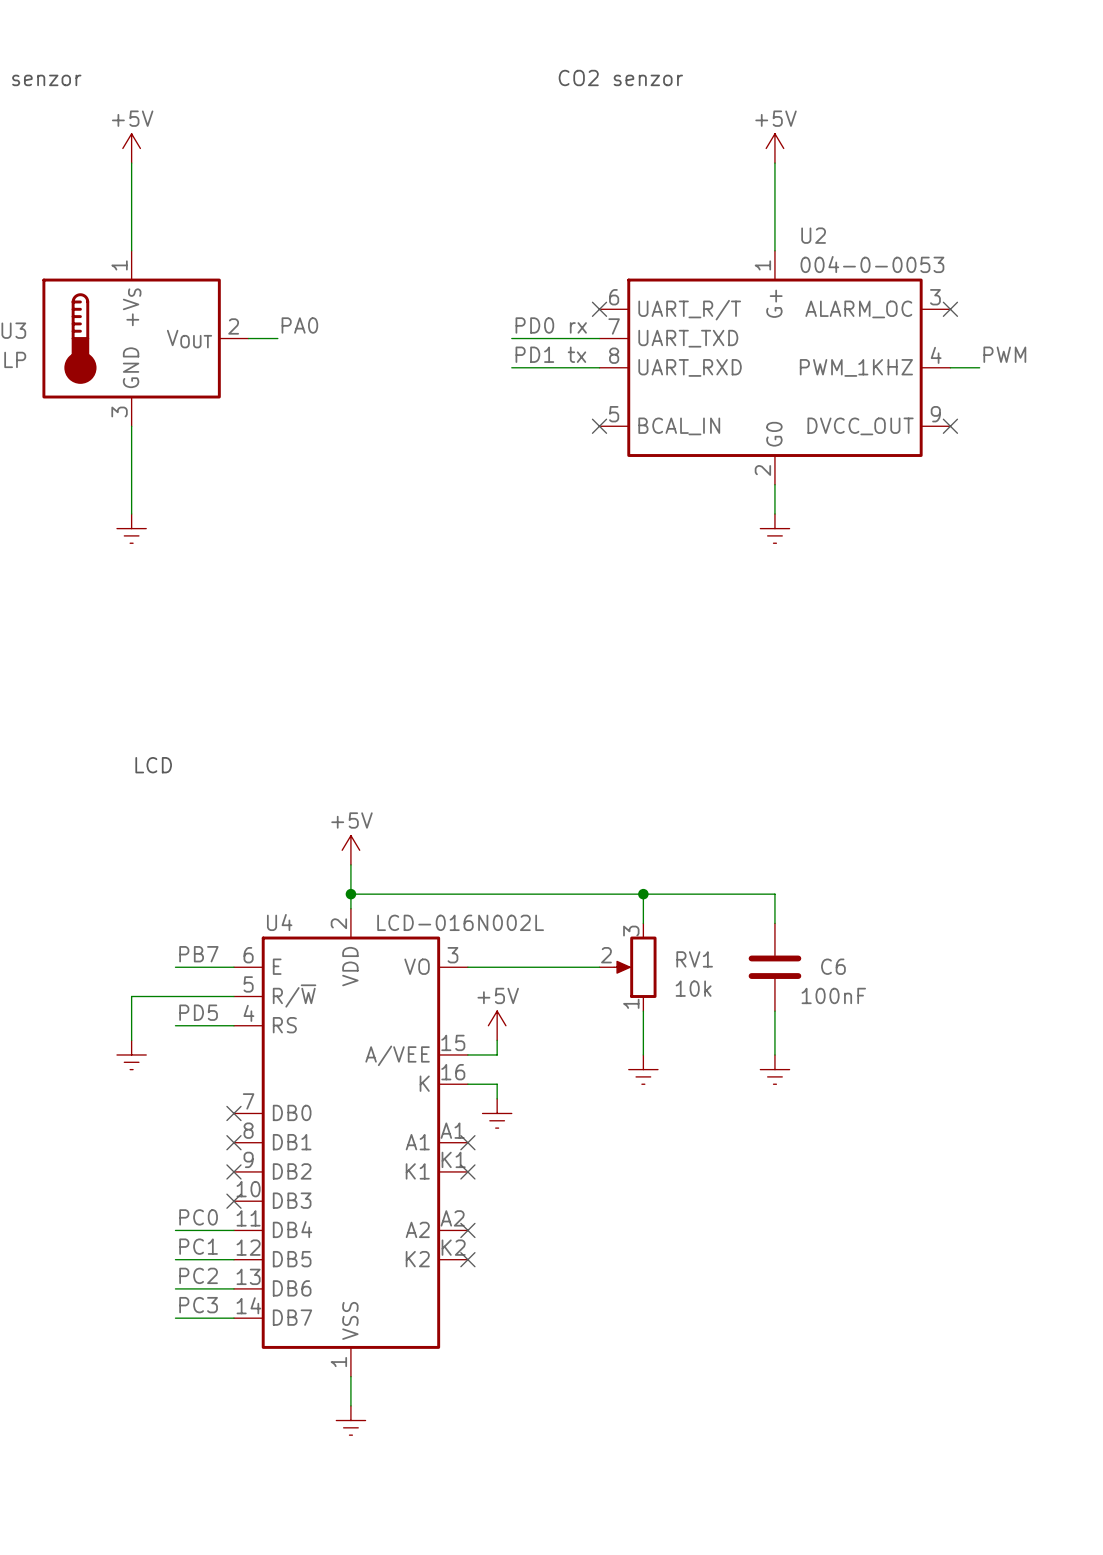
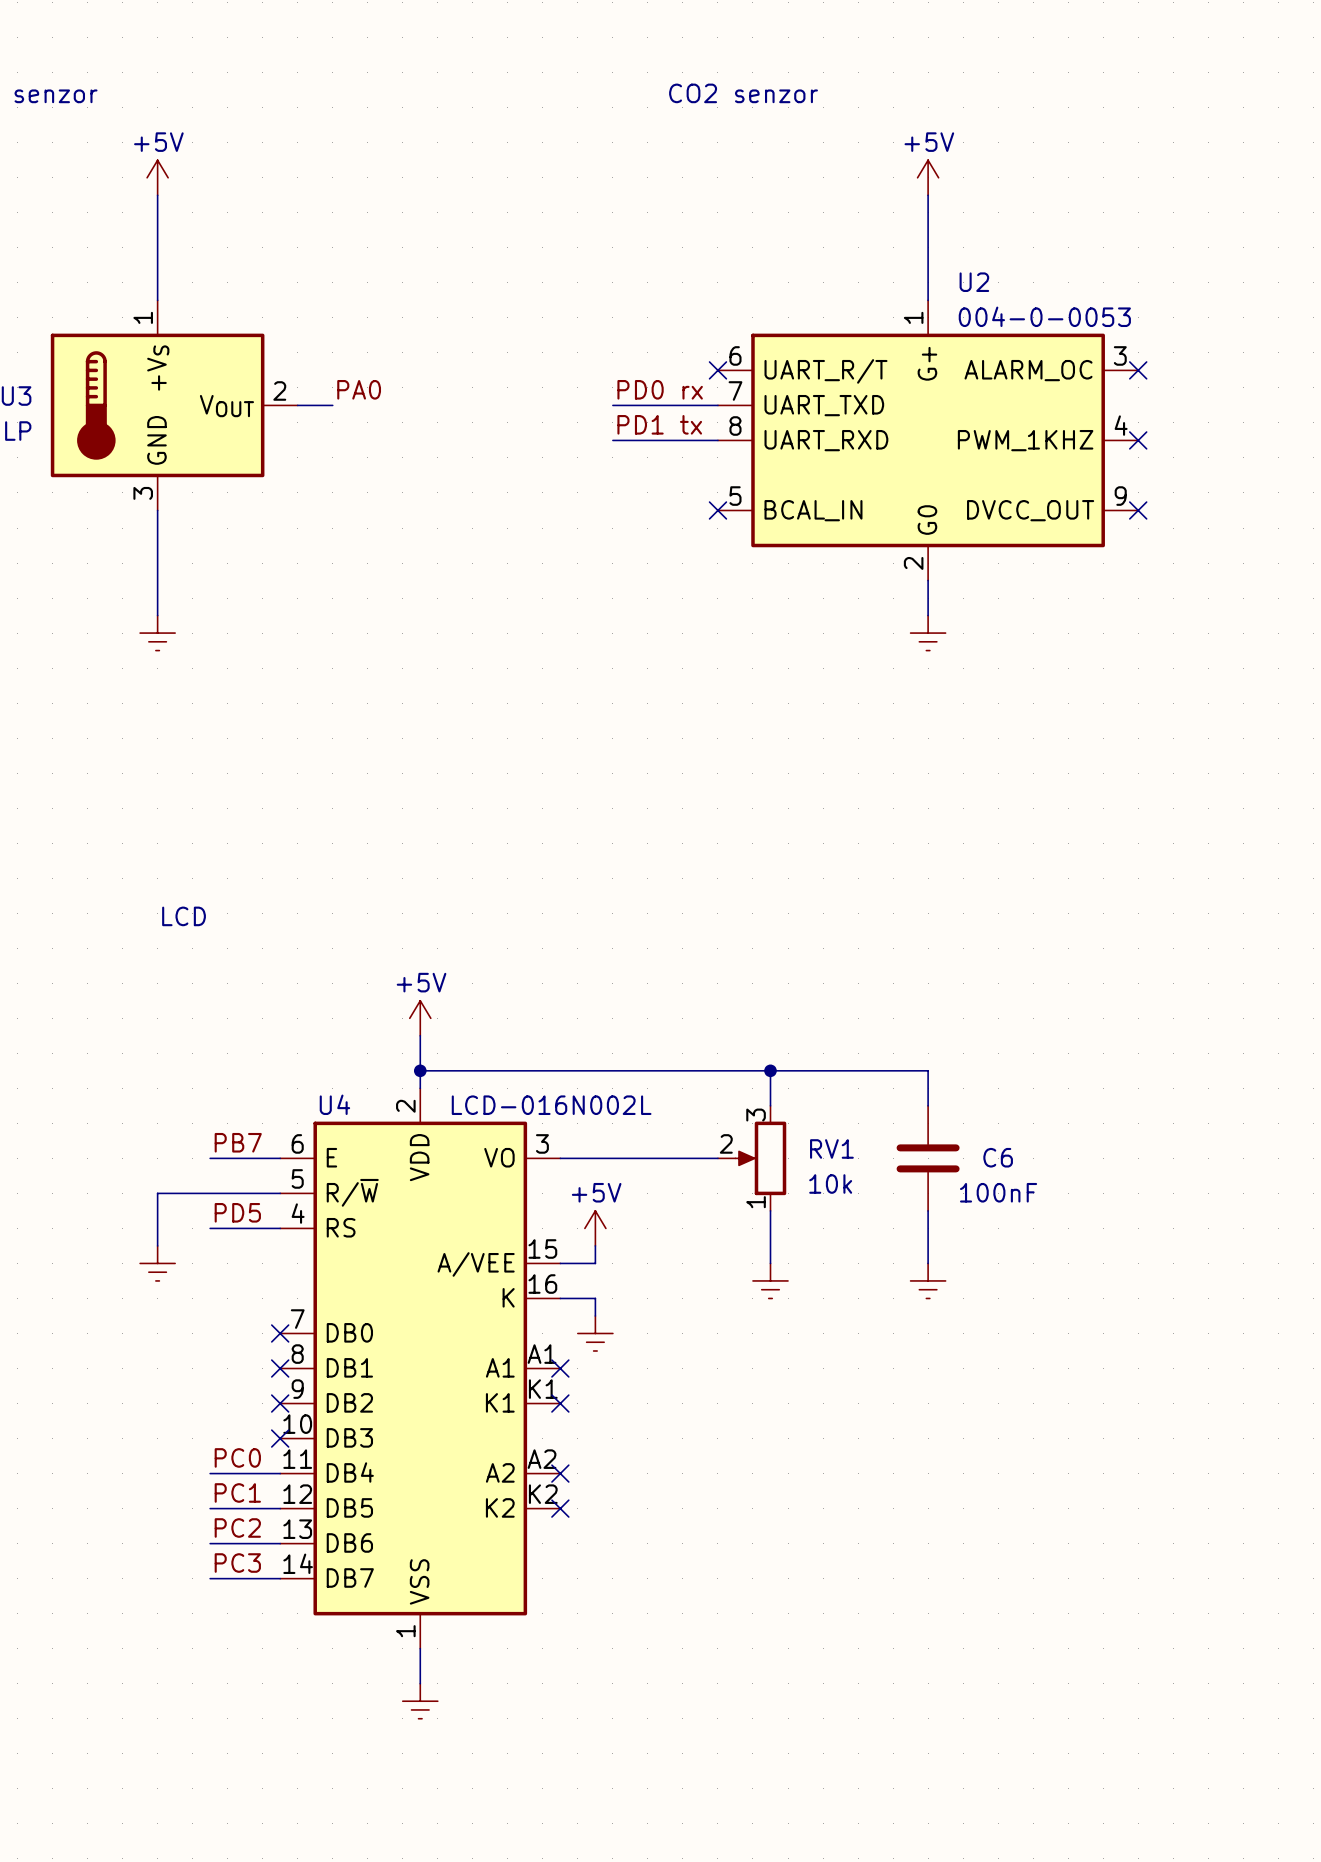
label: PWM (1004, 354) -> none
wire: (950, 367) (979, 367) -> none
no-connect mark: none -> (1138, 440)

